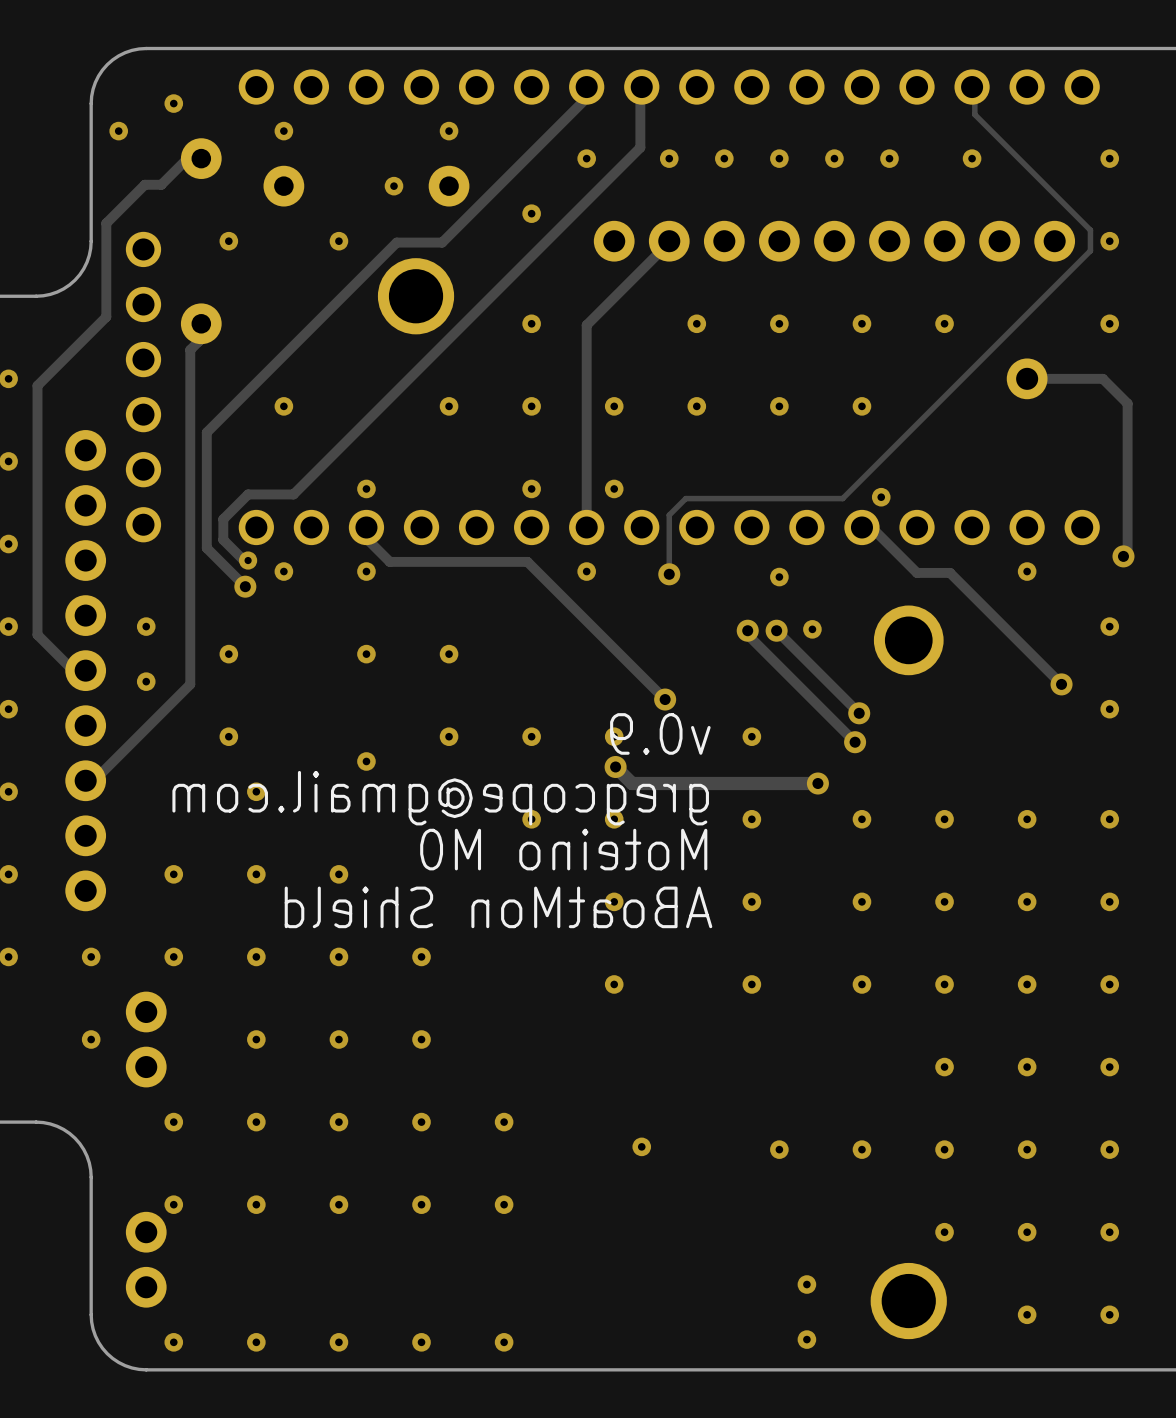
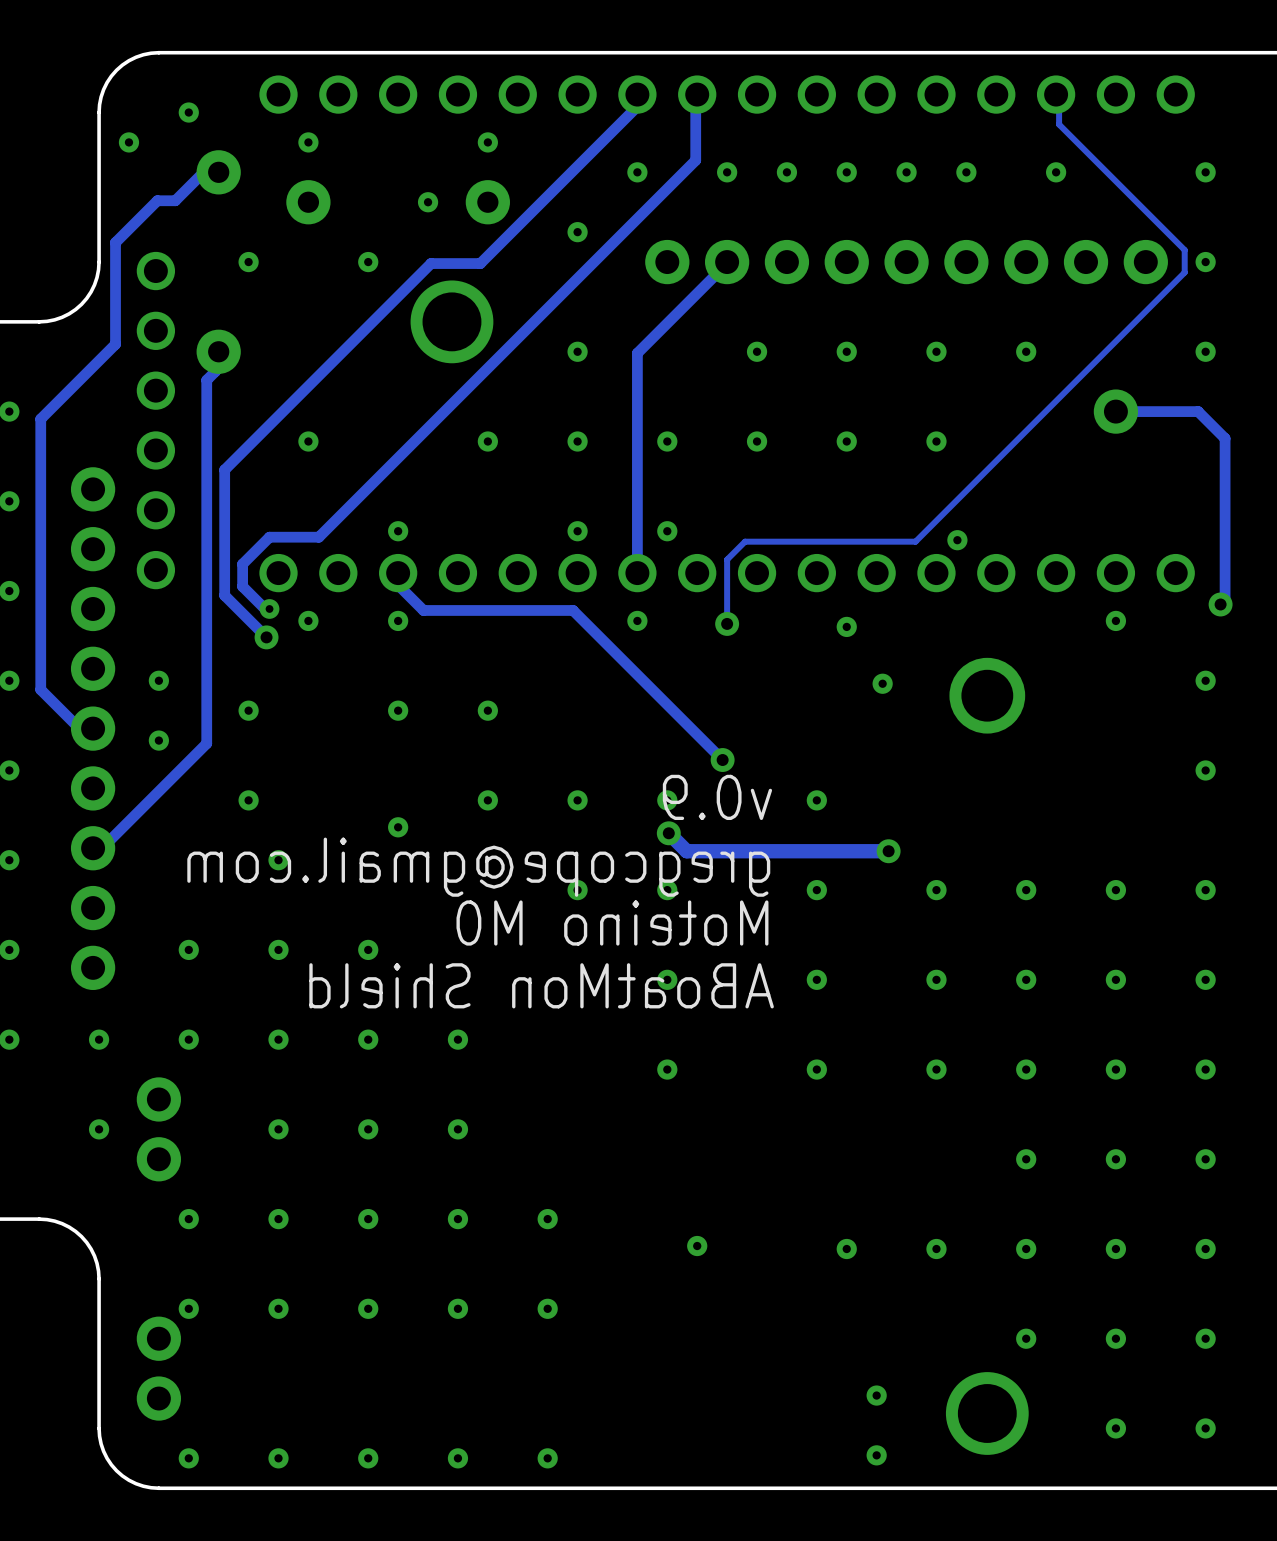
track: (861, 527) (871, 527) (917, 572) (950, 572) (1061, 684) -> none
track: (747, 630) (747, 634) (855, 742) -> none
via: (747, 630) -> none
track: (776, 630) (859, 713) -> none
via: (776, 630) -> none
via: (1061, 684) -> none
via: (859, 713) -> none
via: (855, 742) -> none

